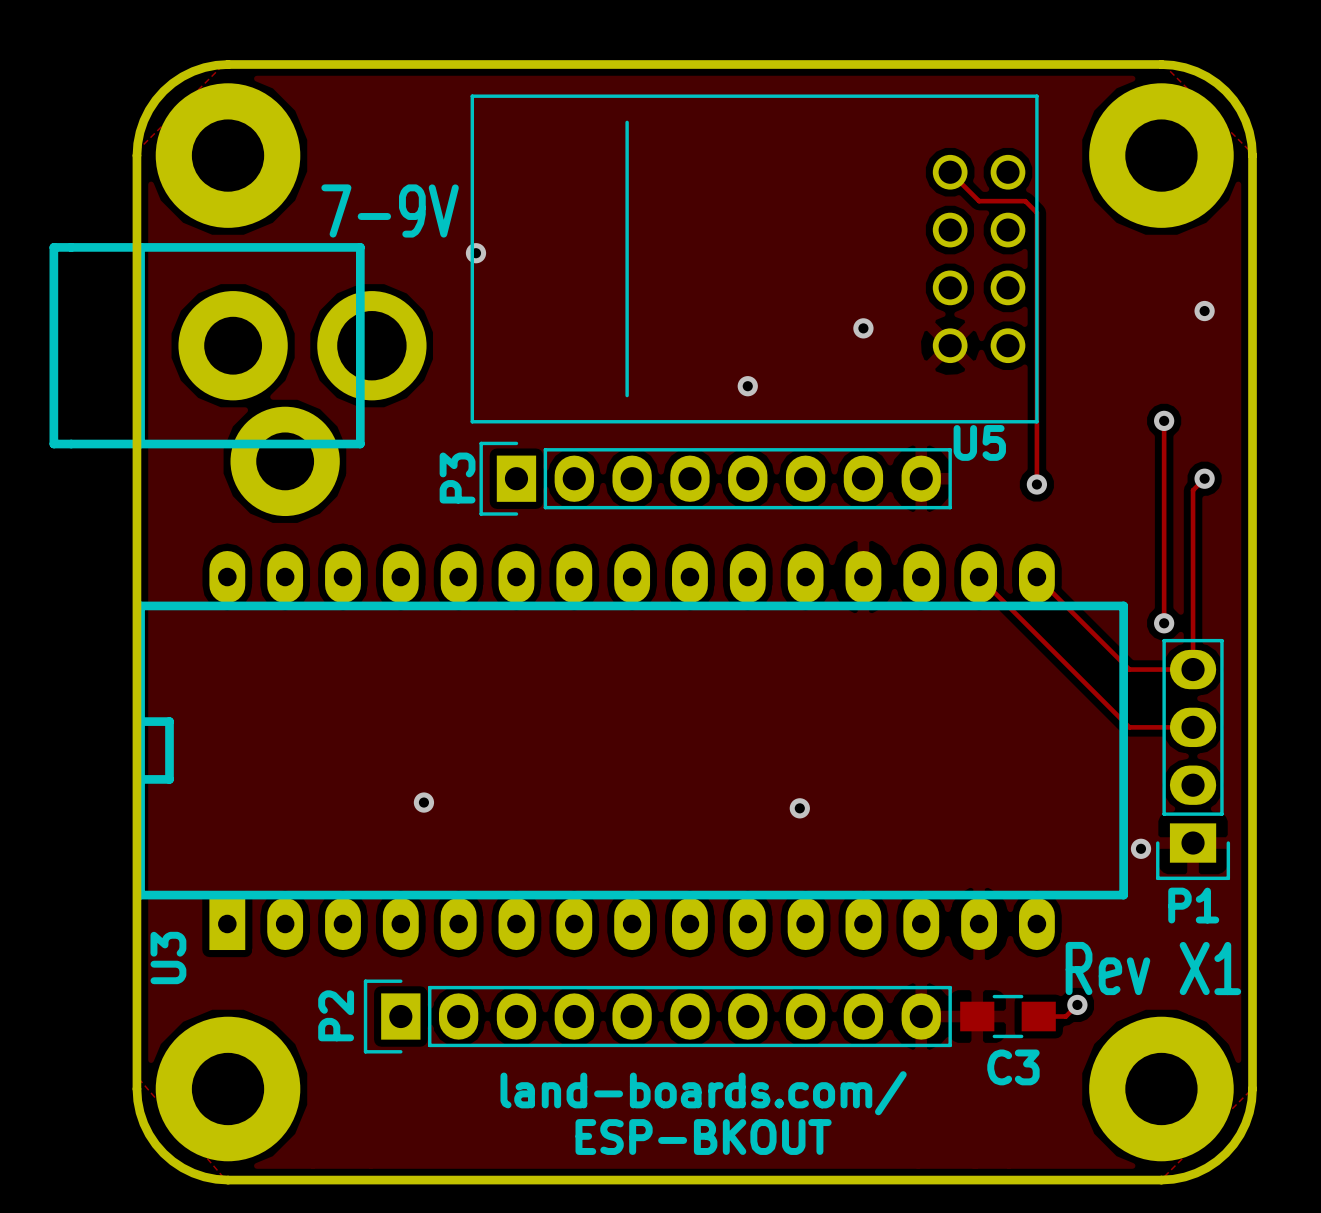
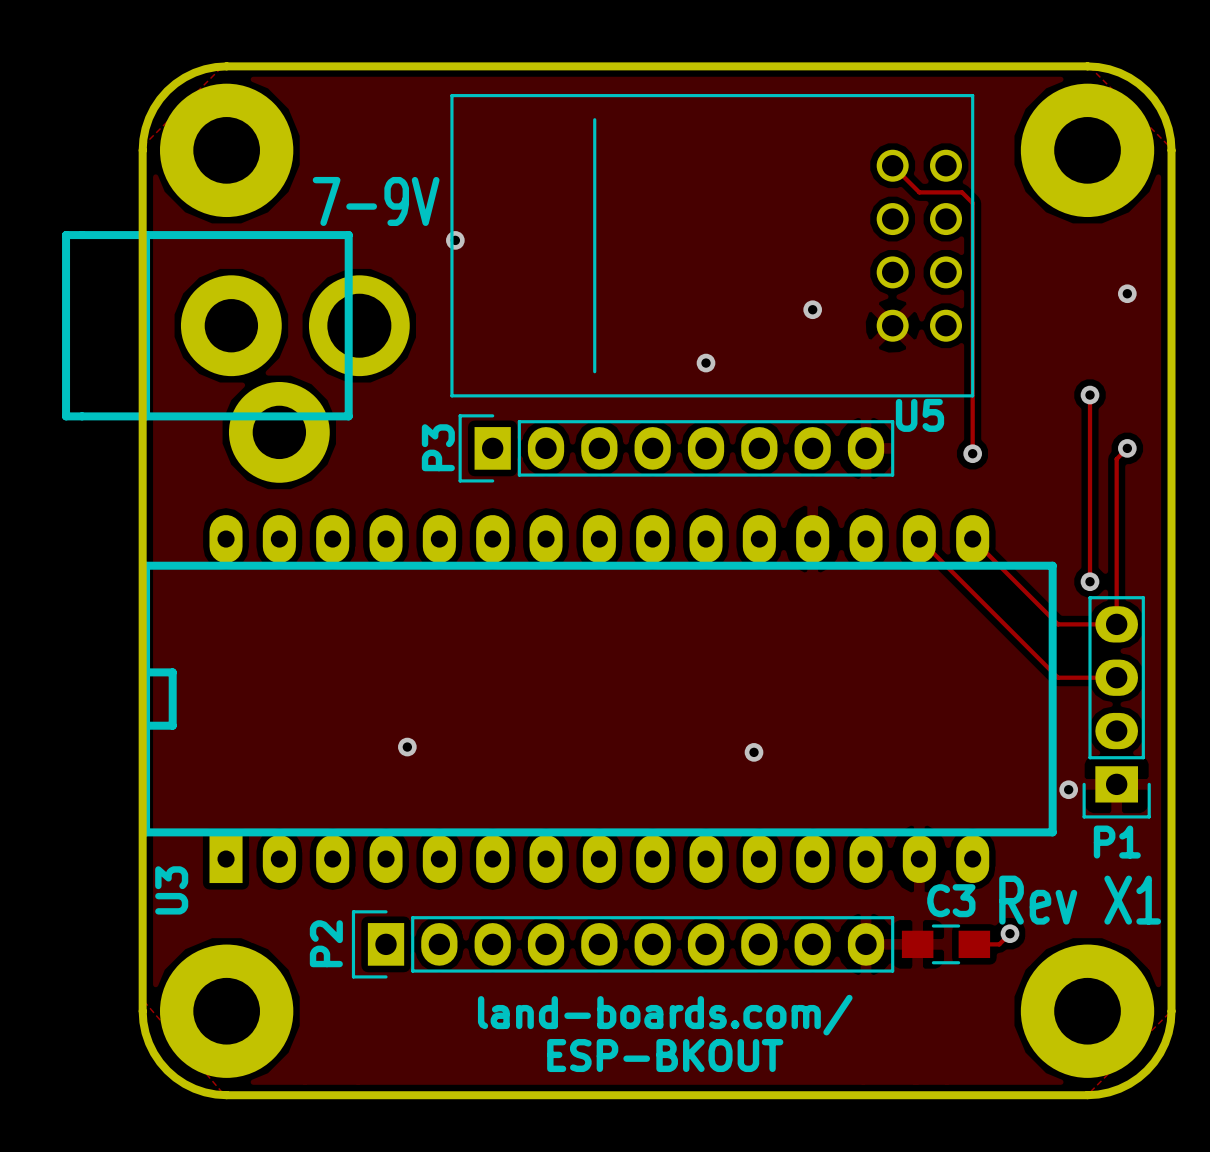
C3 name position: C3 (1013, 1067) -> C3 (951, 900)

